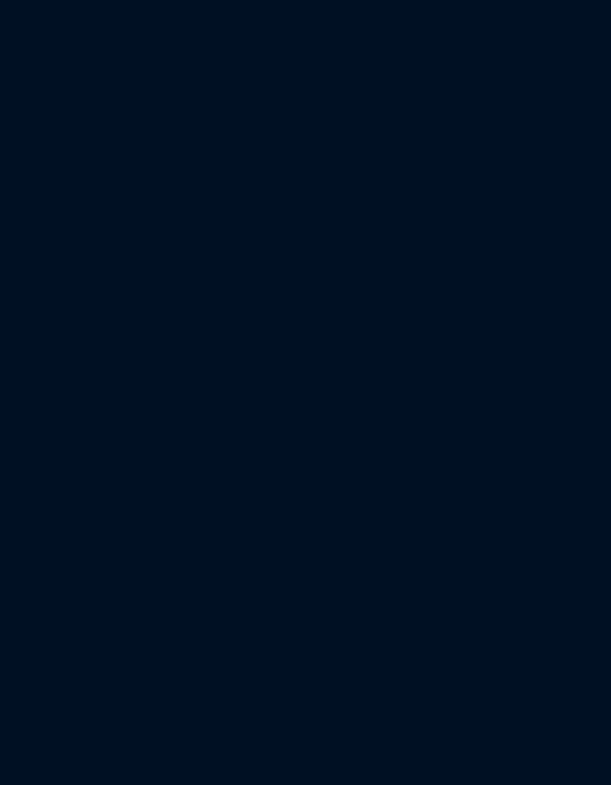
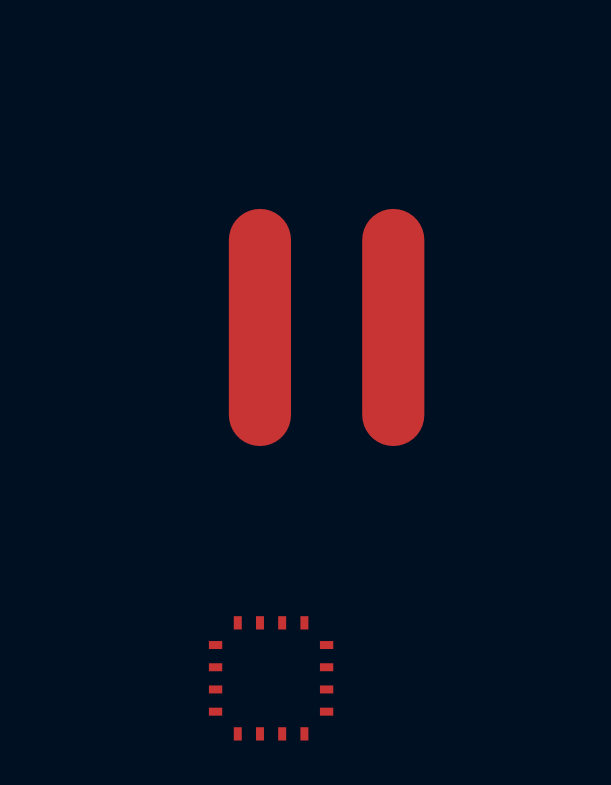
part: none -> (326, 327)
part: none -> (271, 678)

